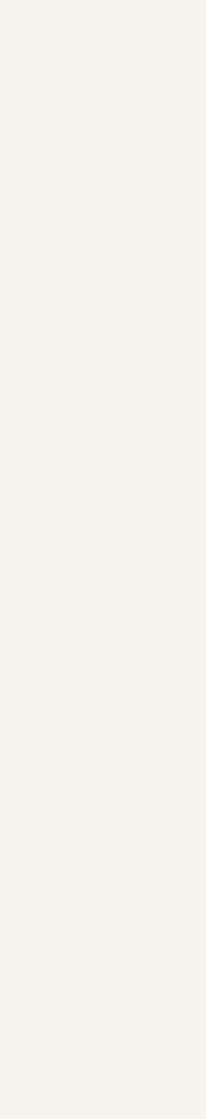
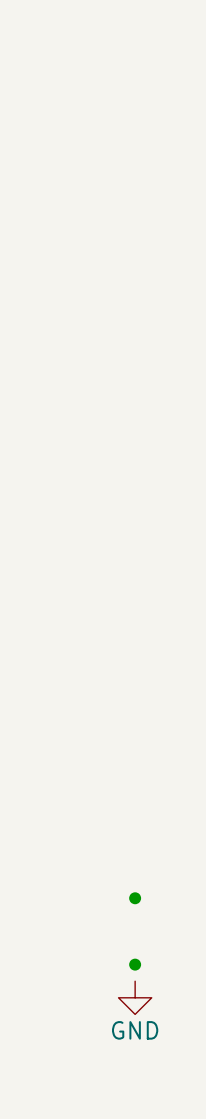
junction: none -> (135, 898)
junction: none -> (135, 964)
power symbol: none -> GND (135, 997)

